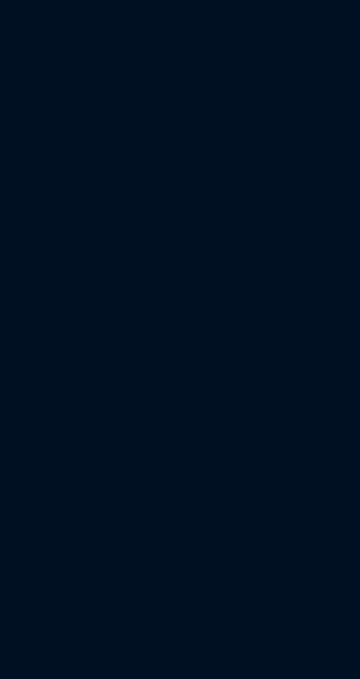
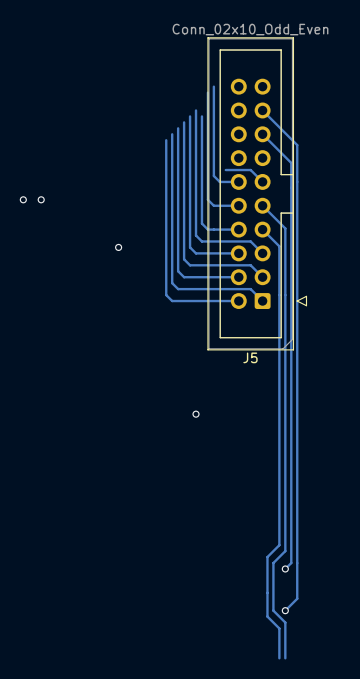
track: none -> (213, 86) (213, 175) (219, 181) (238, 181)
track: none -> (207, 92) (207, 199) (213, 205) (238, 205)
track: none -> (196, 110) (196, 235) (201, 241) (250, 241) (262, 253)
track: none -> (262, 110) (297, 145) (297, 598) (285, 610)
track: none -> (190, 116) (190, 247) (196, 253) (238, 253)
track: none -> (201, 116) (201, 223) (207, 229) (238, 229)
track: none -> (184, 122) (184, 259) (190, 265) (250, 265) (262, 277)
track: none -> (178, 128) (178, 271) (184, 277) (238, 277)
track: none -> (172, 134) (172, 283) (178, 289) (250, 289) (262, 301)
track: none -> (262, 134) (291, 162) (291, 563) (285, 568)
track: none -> (166, 140) (166, 295) (172, 301) (238, 301)
track: none -> (225, 170) (250, 170) (262, 181)
J5: none -> Conn_02x10_Odd_Even (257, 193)
via: none -> (23, 199)
via: none -> (41, 199)
track: none -> (262, 205) (285, 228) (285, 551) (273, 563) (273, 610) (285, 622) (285, 658)
track: none -> (262, 229) (279, 246) (279, 545) (267, 557) (267, 616) (279, 628) (279, 658)
via: none -> (118, 247)
via: none -> (196, 414)
via: none -> (285, 568)
via: none -> (285, 610)

